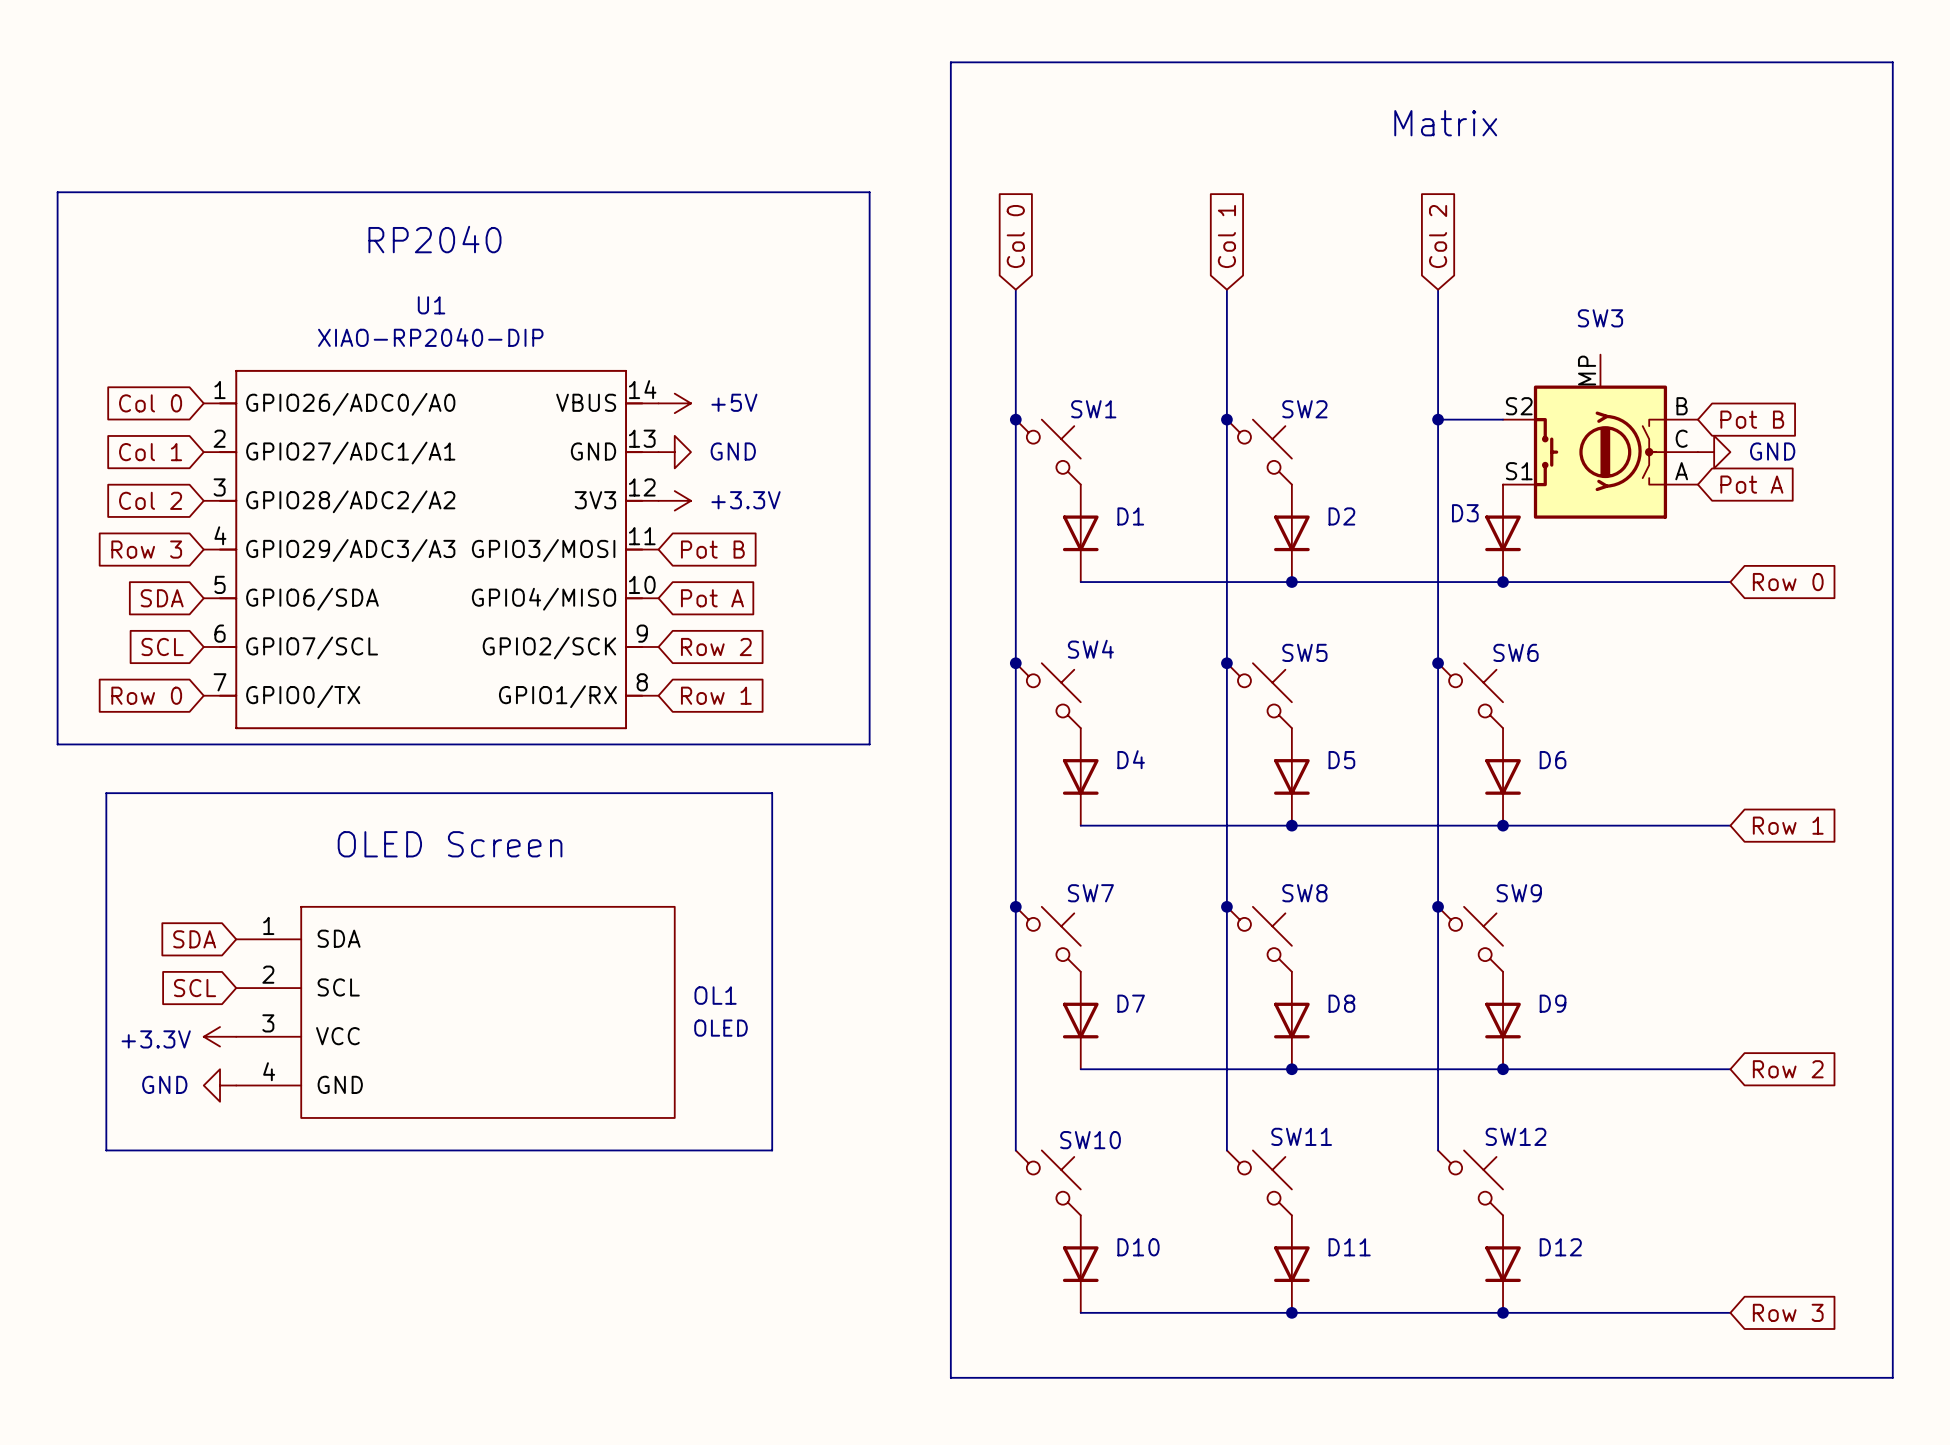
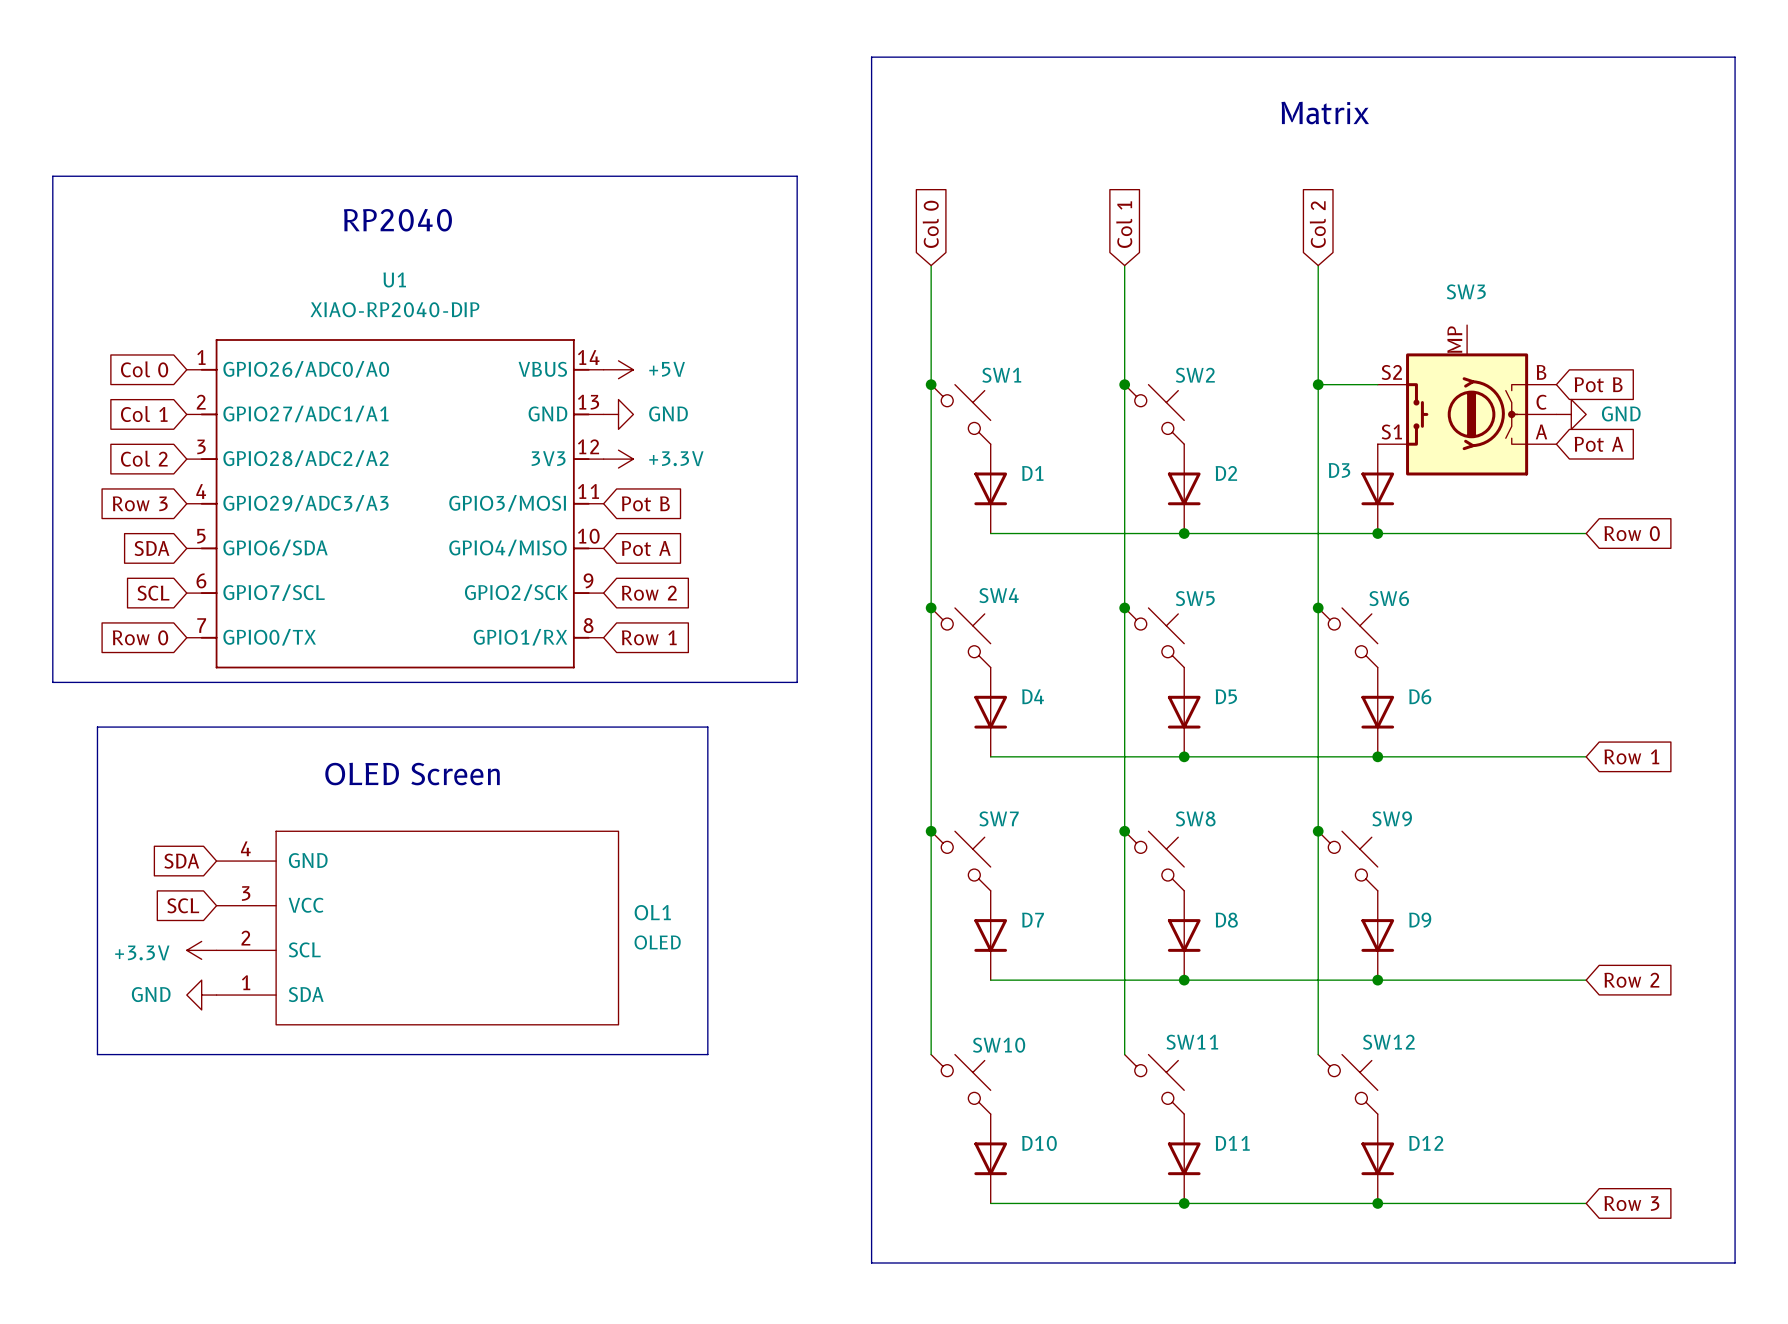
OL1 flip: as is (487, 1012) -> up-down (447, 928)

